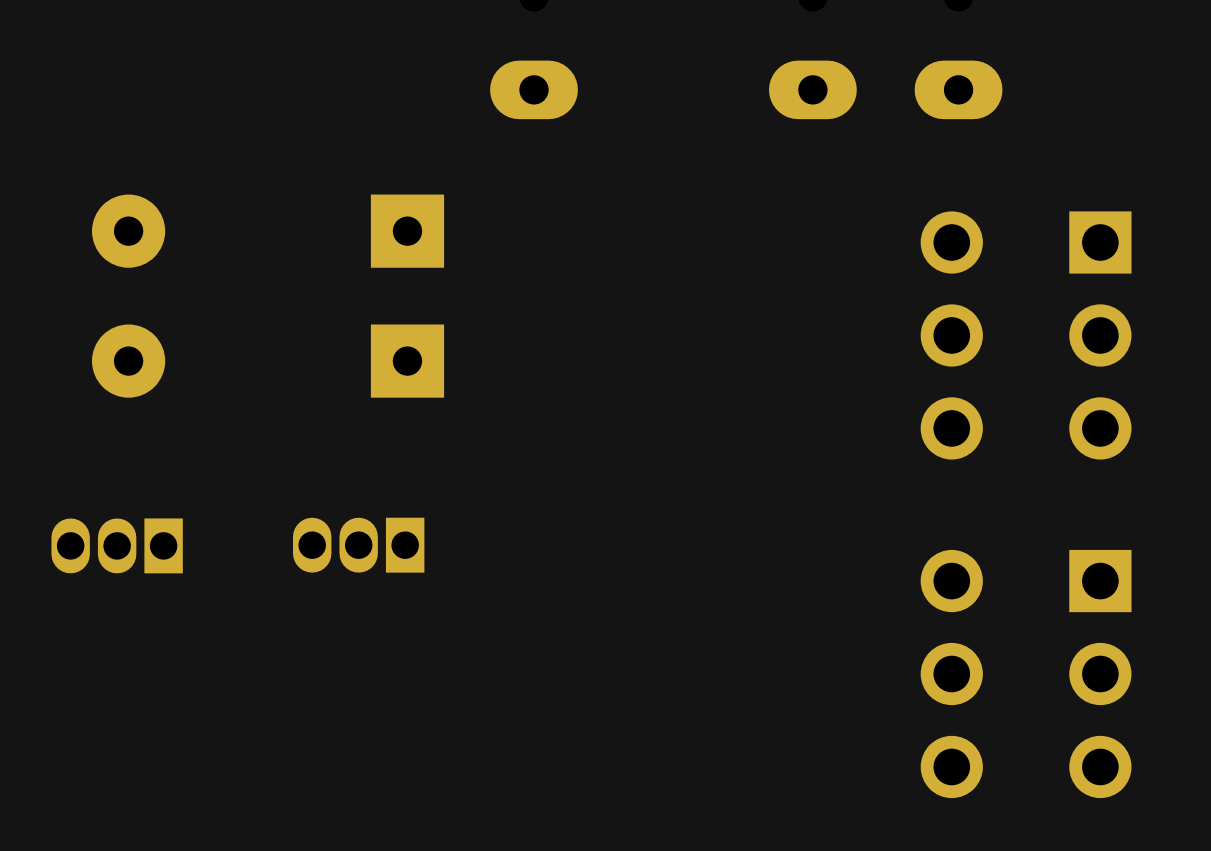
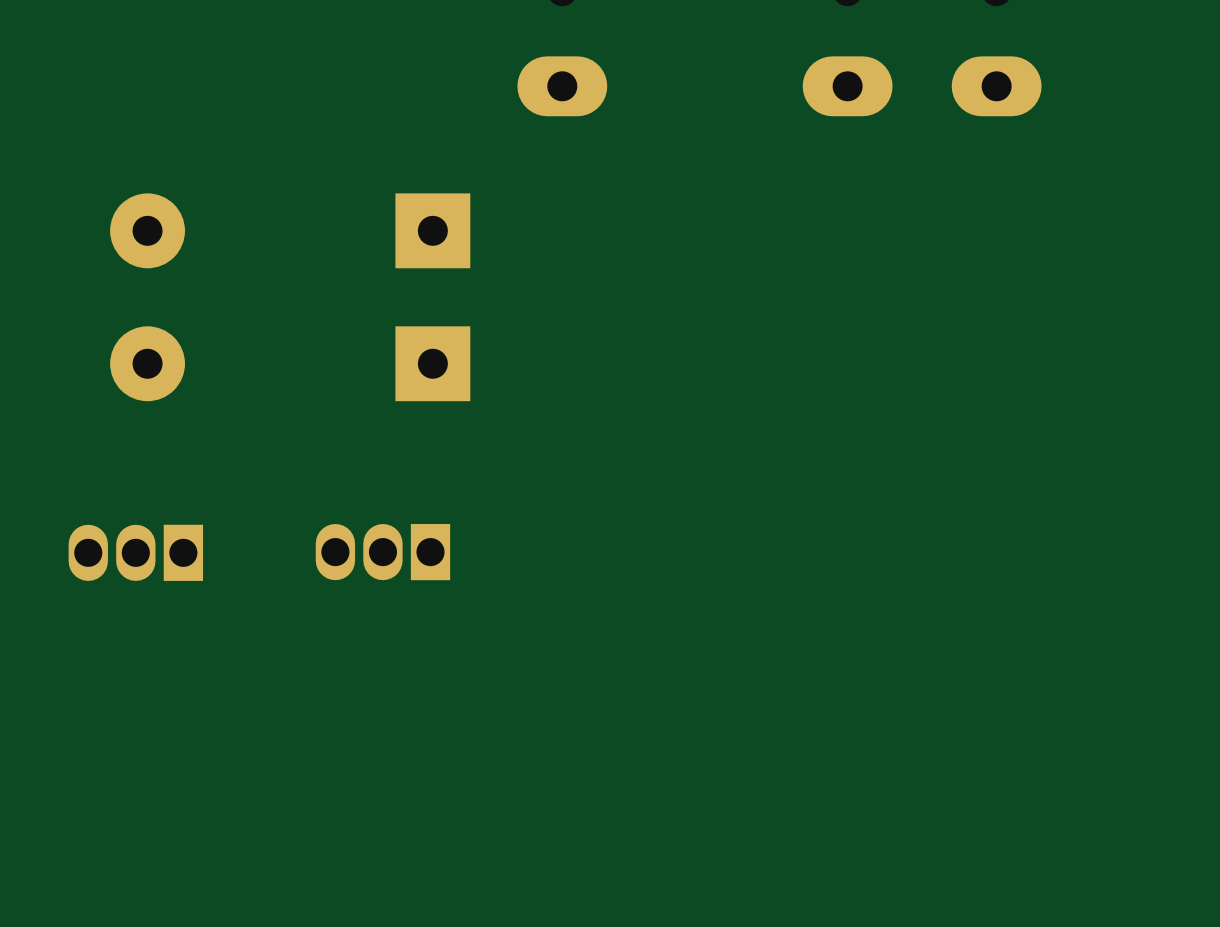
part: (1026, 335) -> none
part: (1026, 674) -> none

